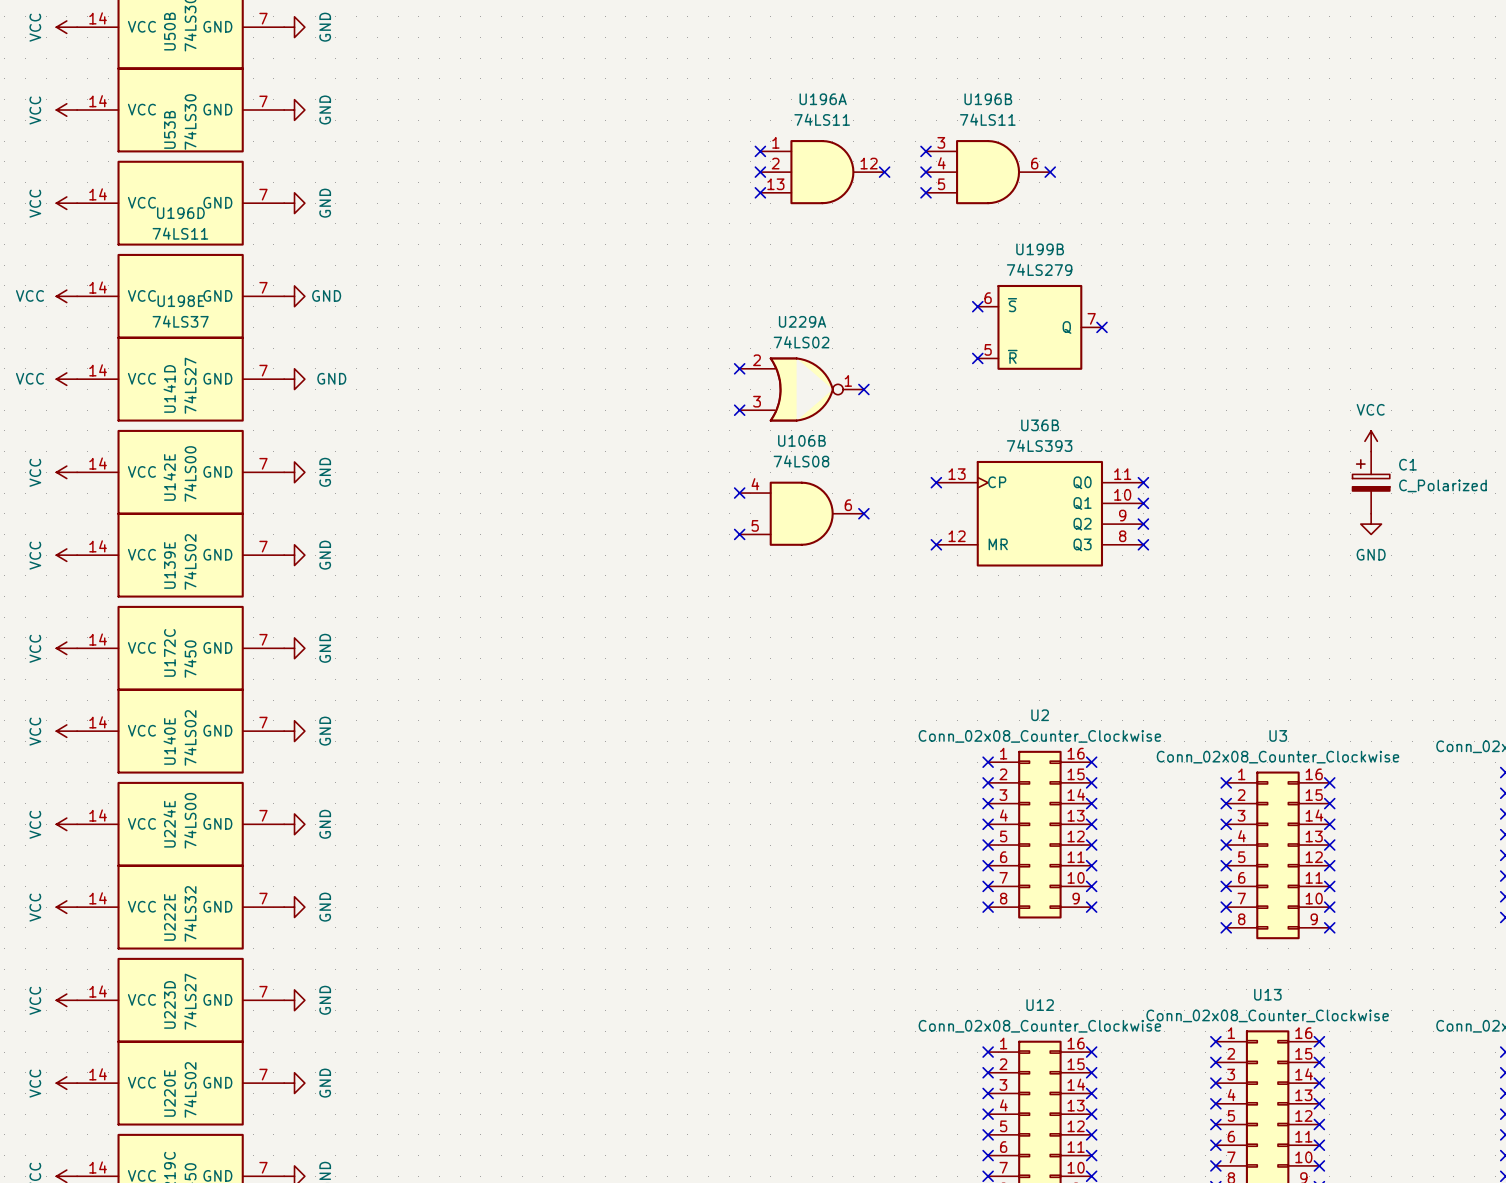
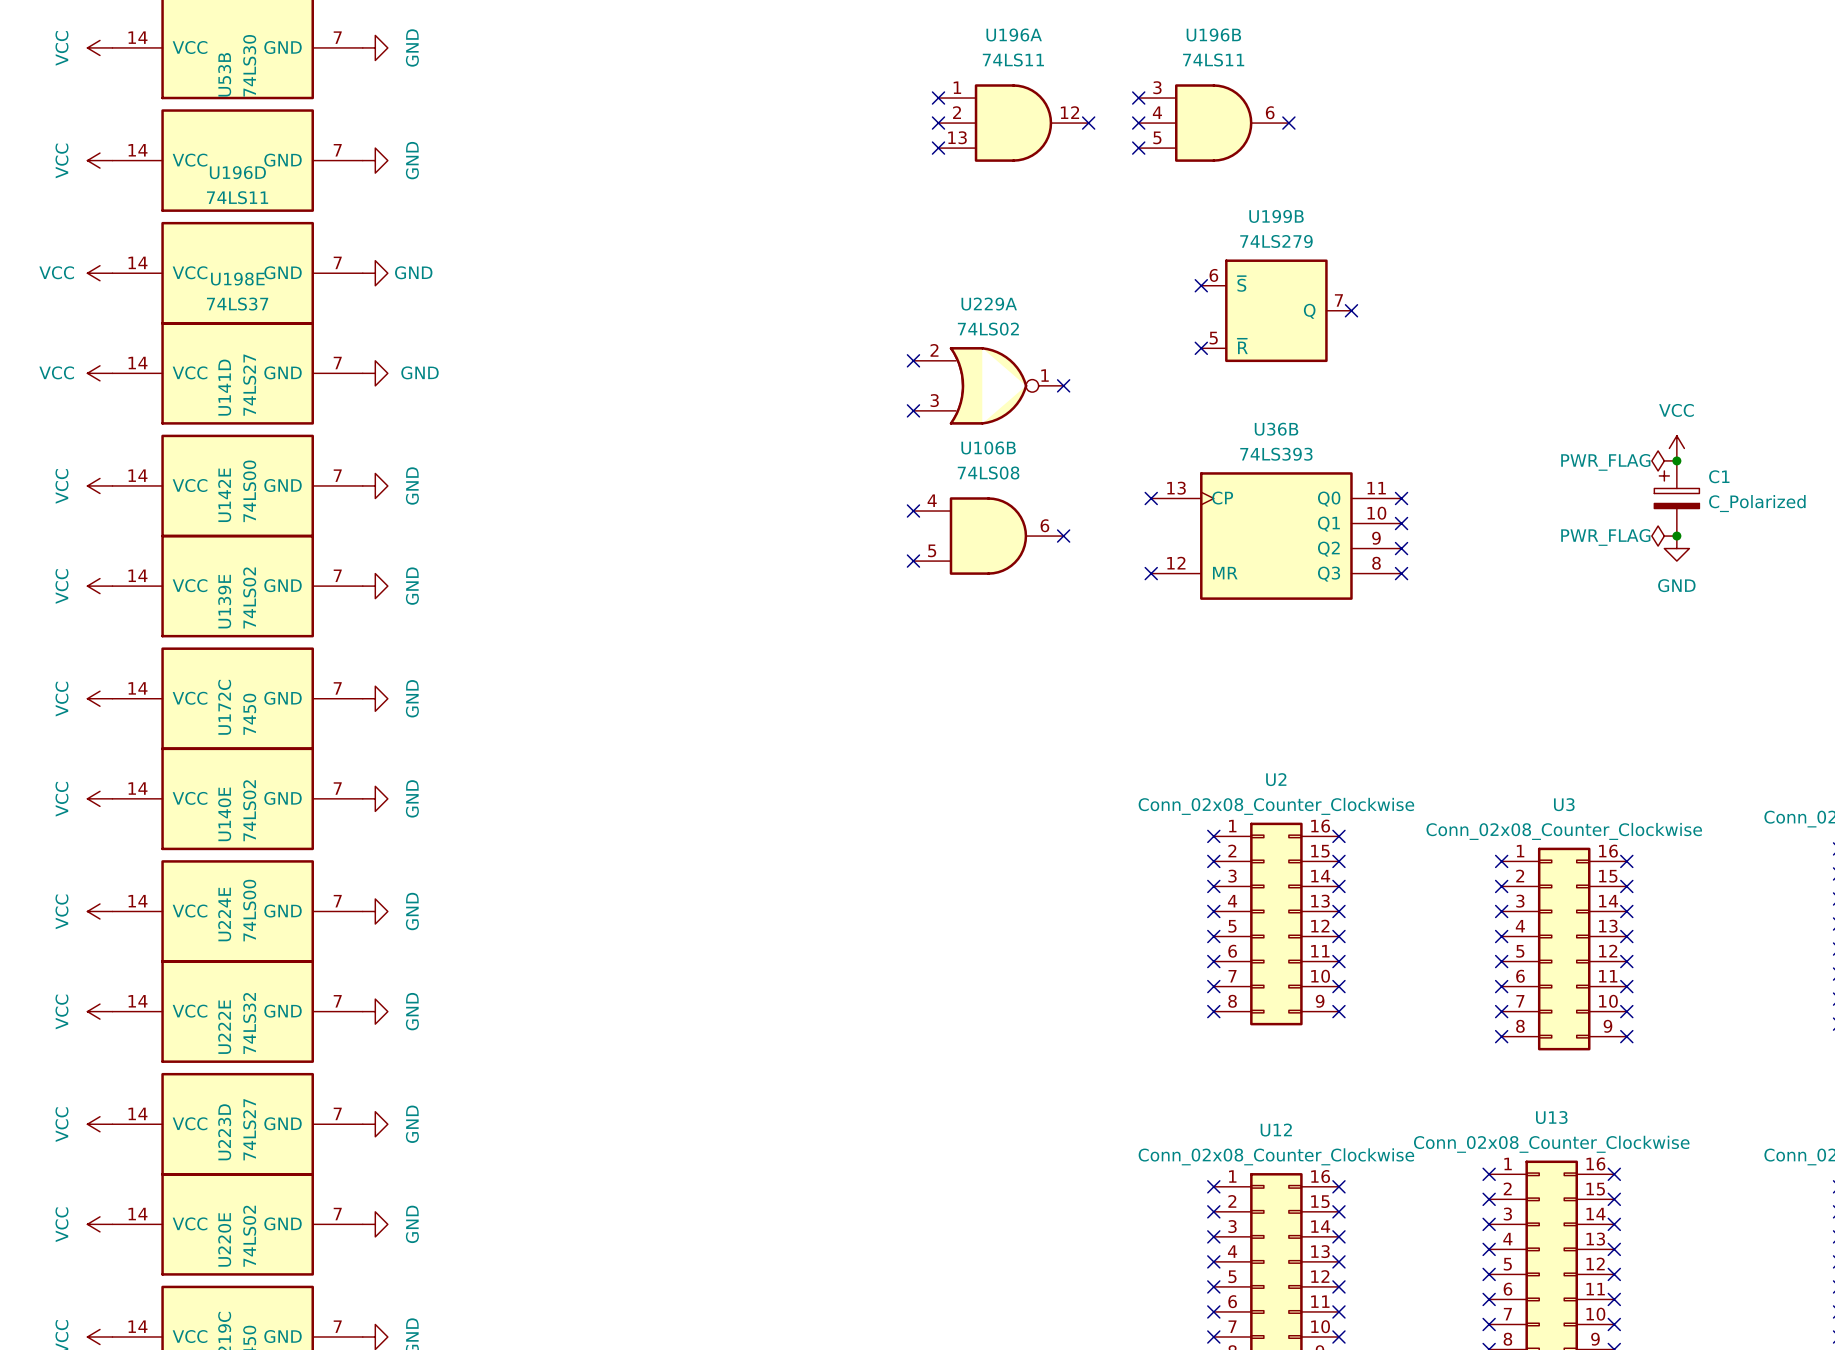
power symbol: none -> PWR_FLAG (1664, 460)
junction: none -> (1676, 460)
power symbol: none -> PWR_FLAG (1664, 536)
junction: none -> (1676, 536)

